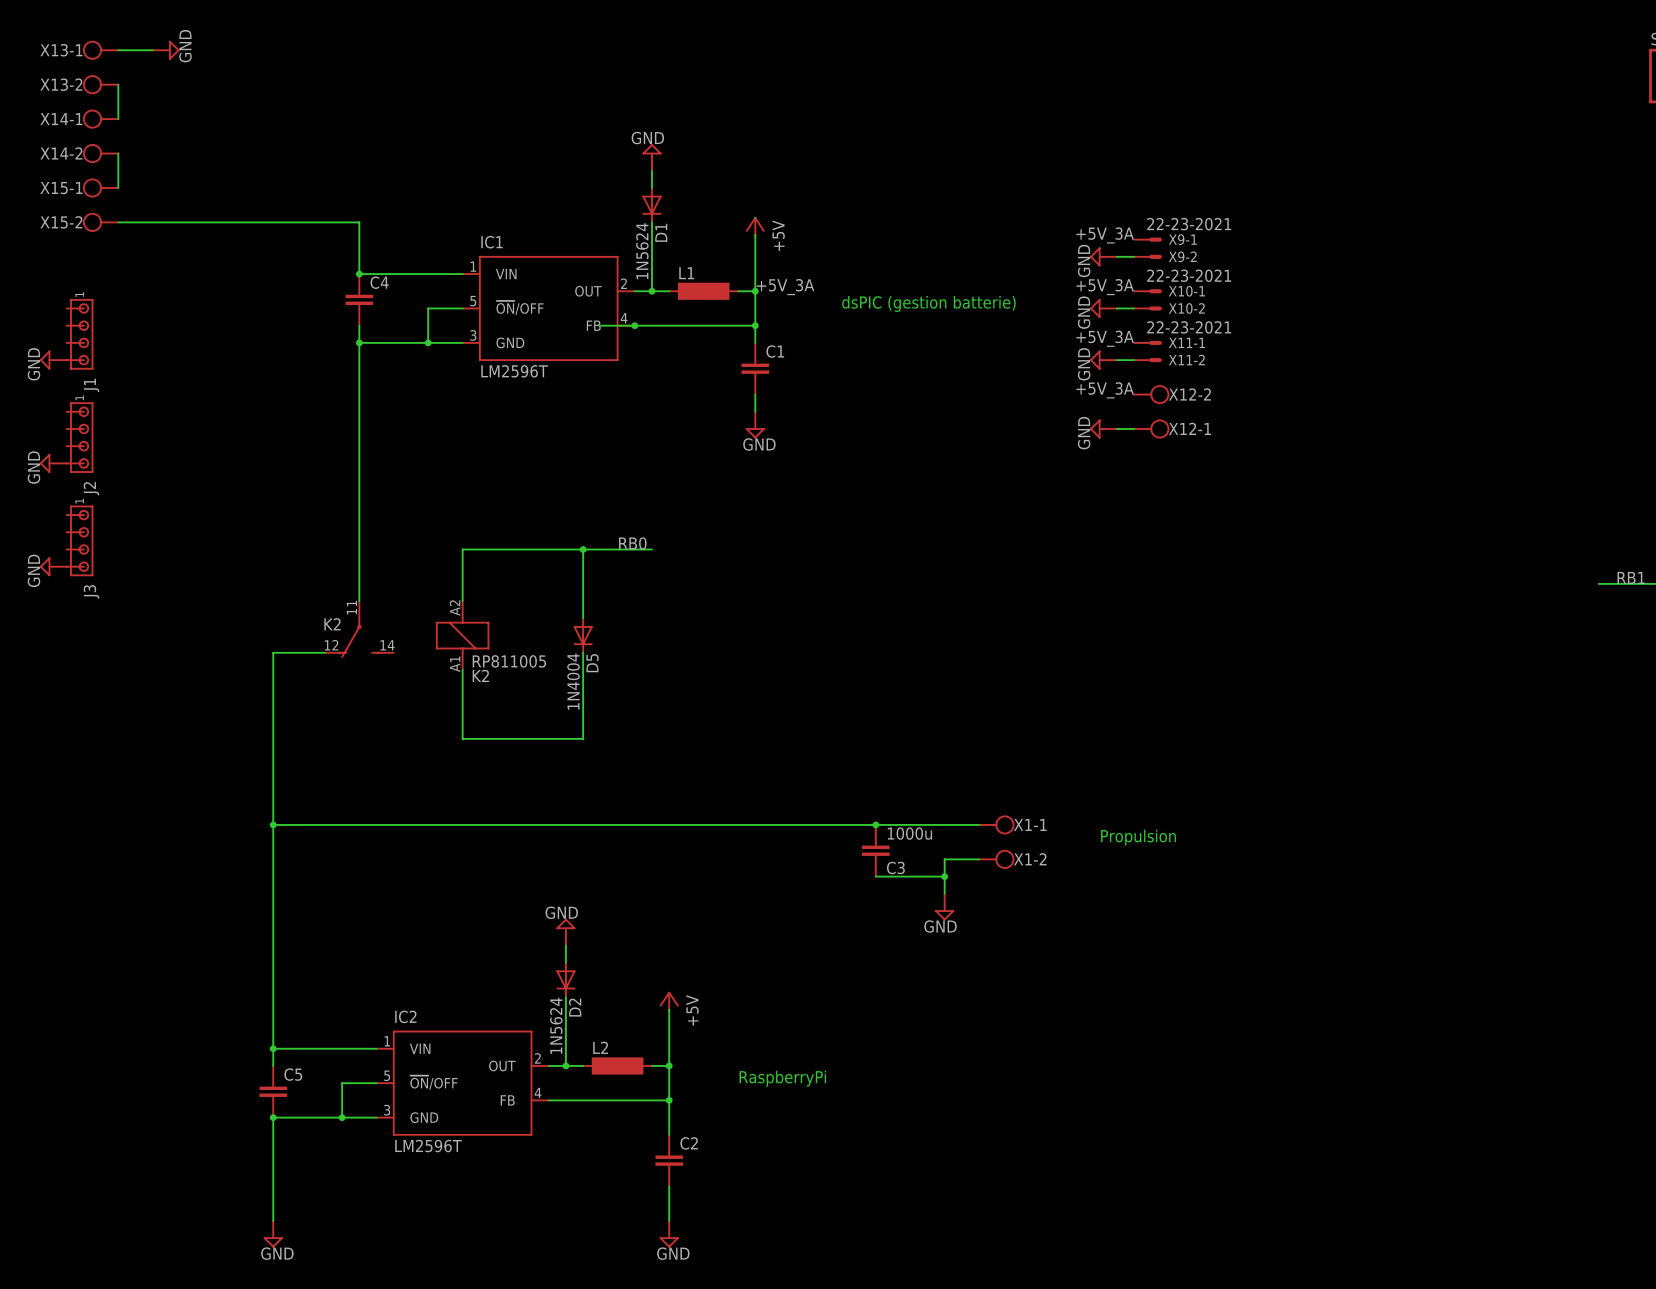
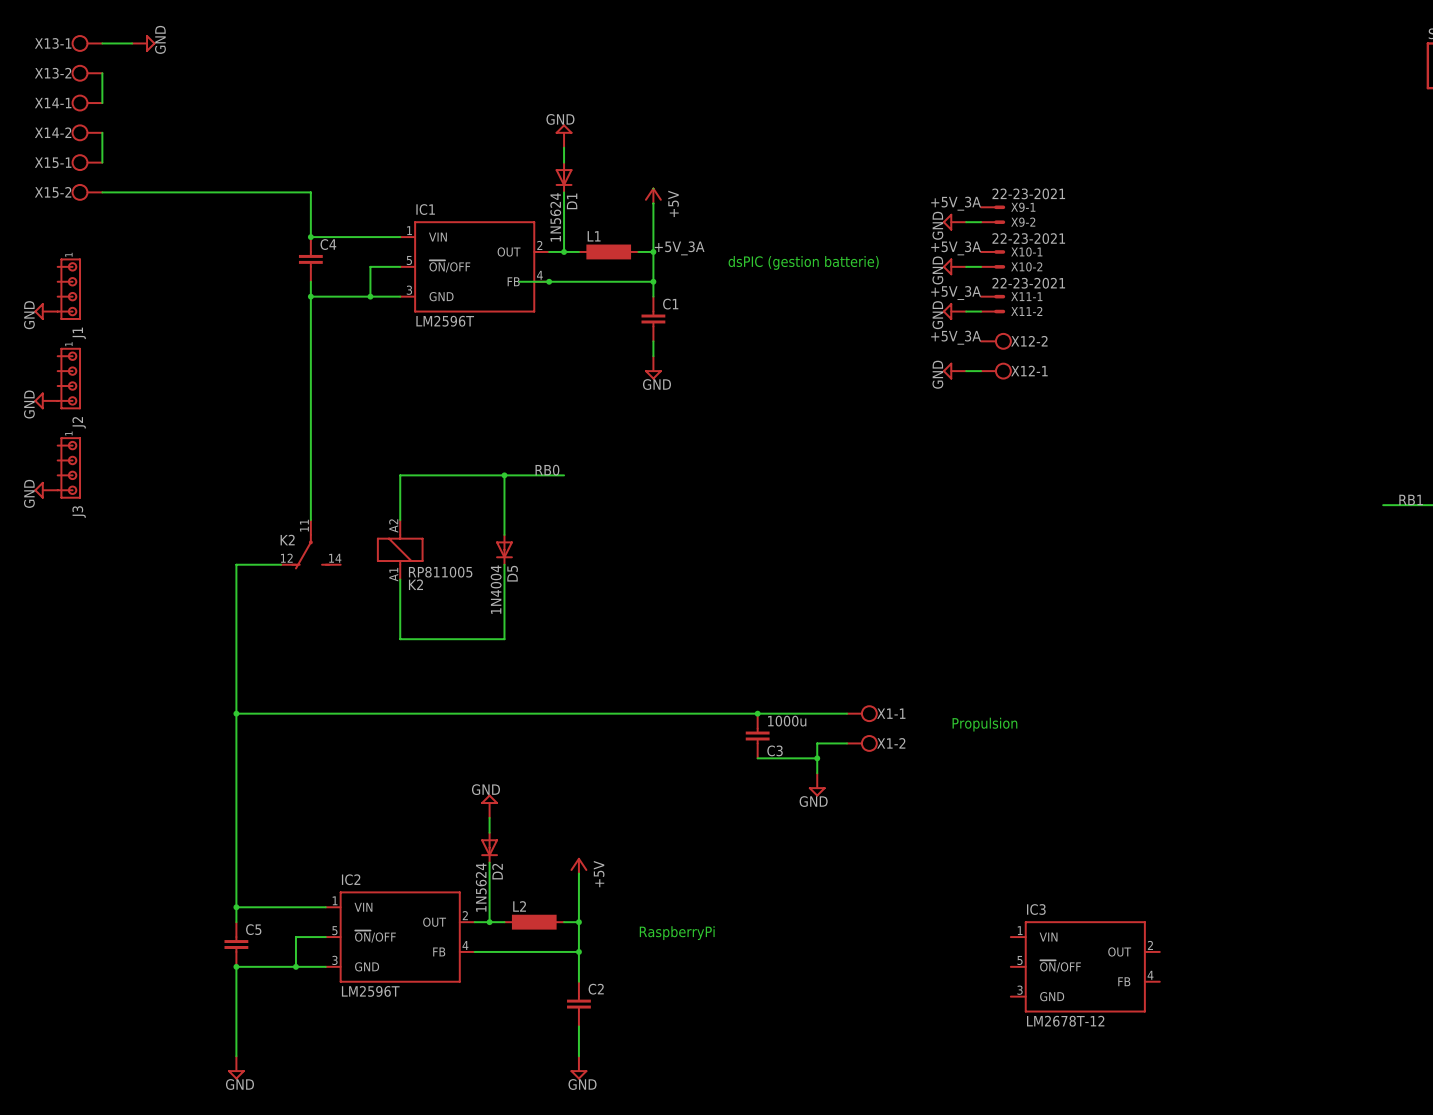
IC3: none -> LM2678T-12 (1085, 966)

